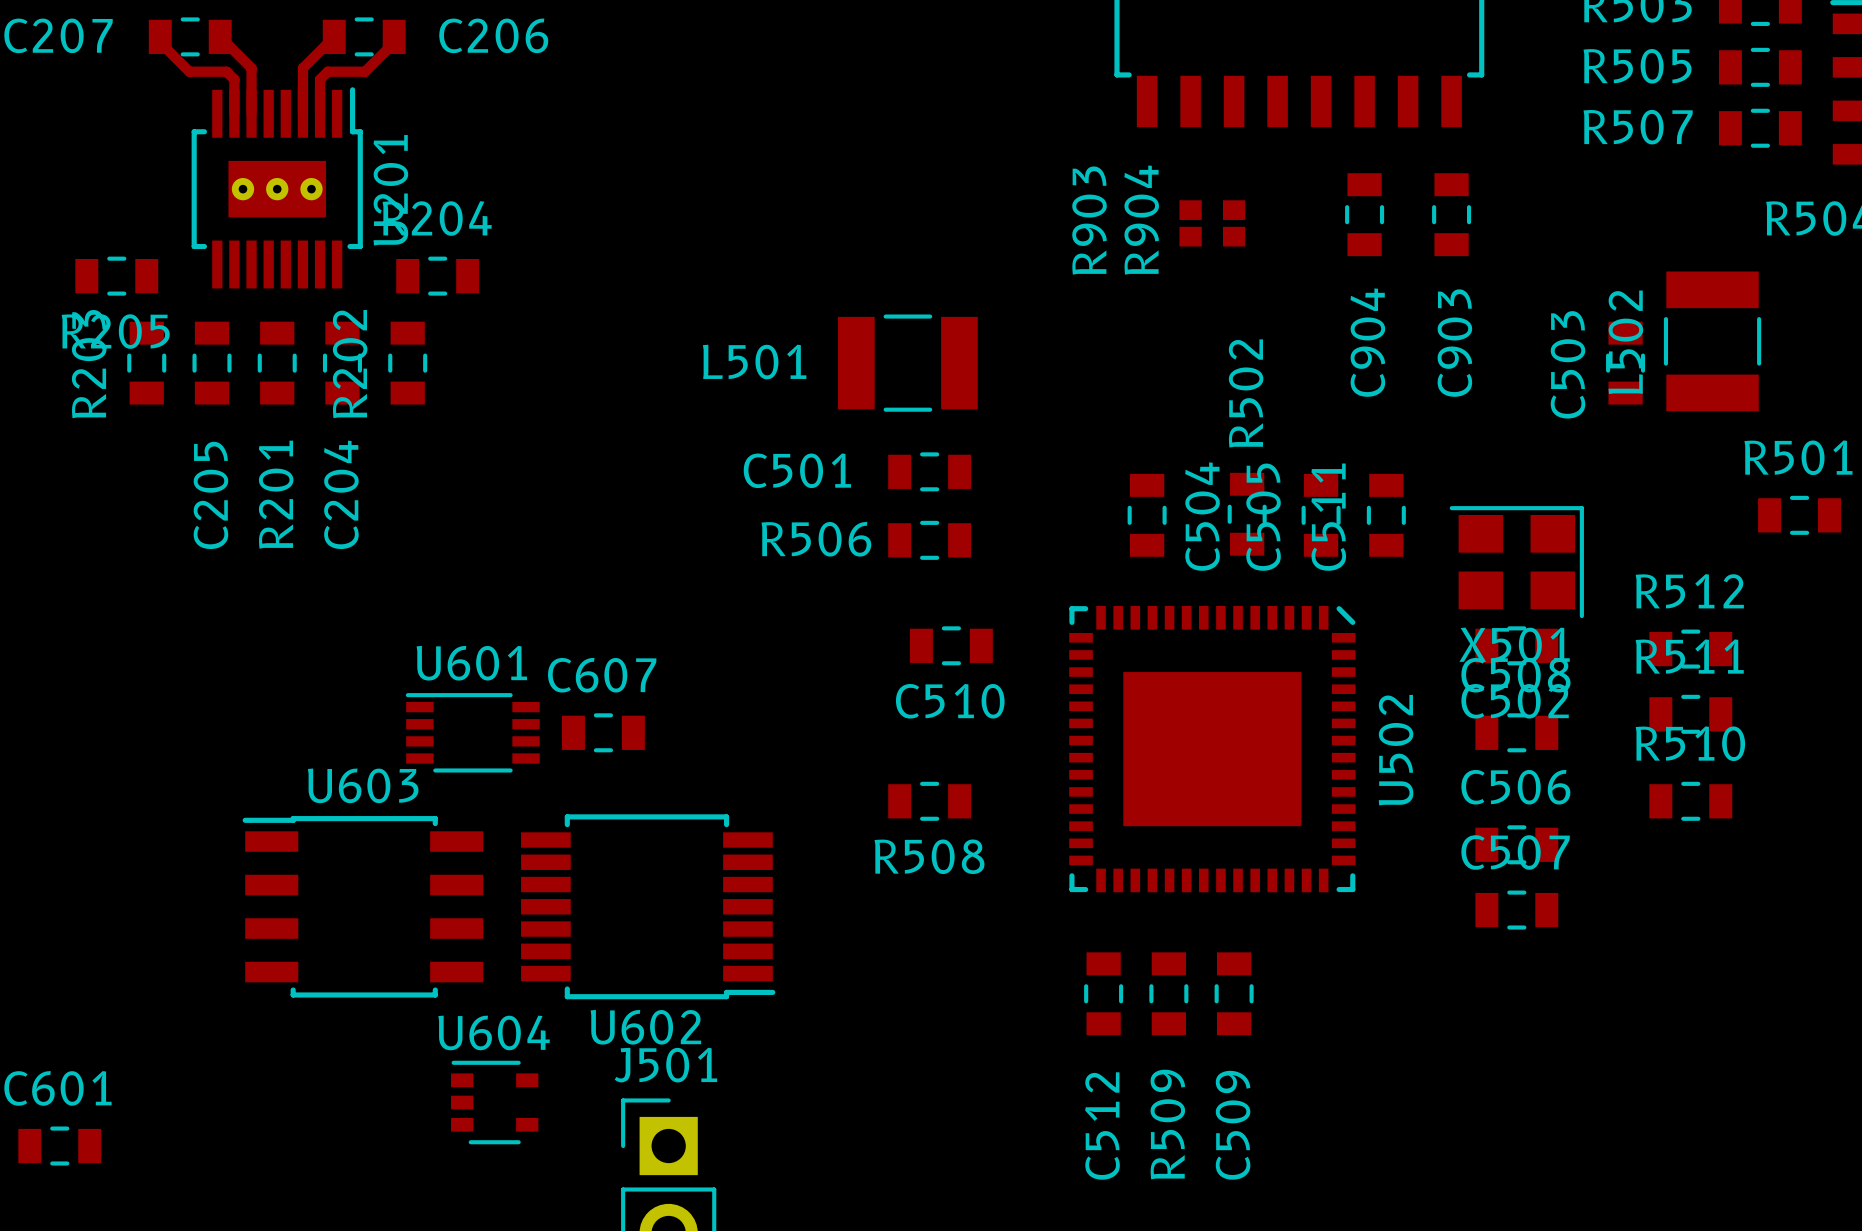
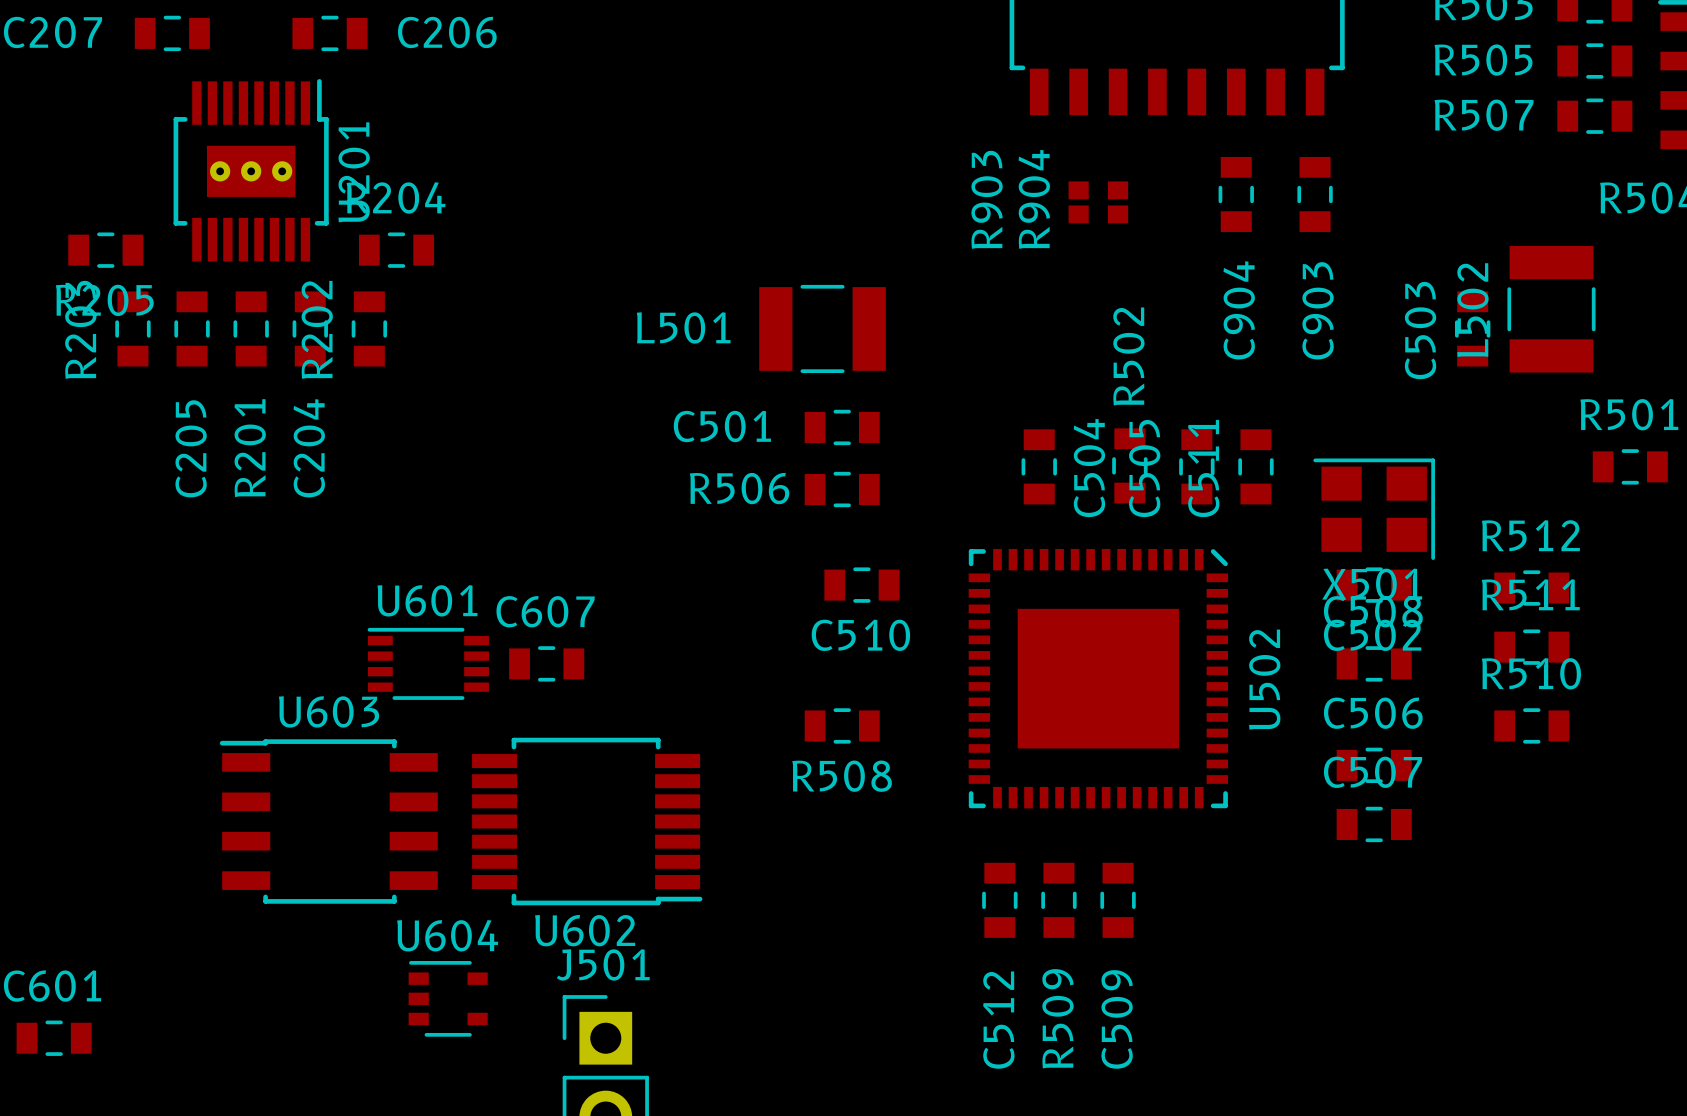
track: (160, 36) (160, 42) (189, 71) (226, 71) (234, 79) (234, 113) -> none
track: (220, 36) (251, 68) (251, 113) -> none
track: (334, 36) (302, 68) (302, 113) -> none
track: (394, 36) (394, 42) (365, 71) (327, 71) (320, 79) (320, 113) -> none

